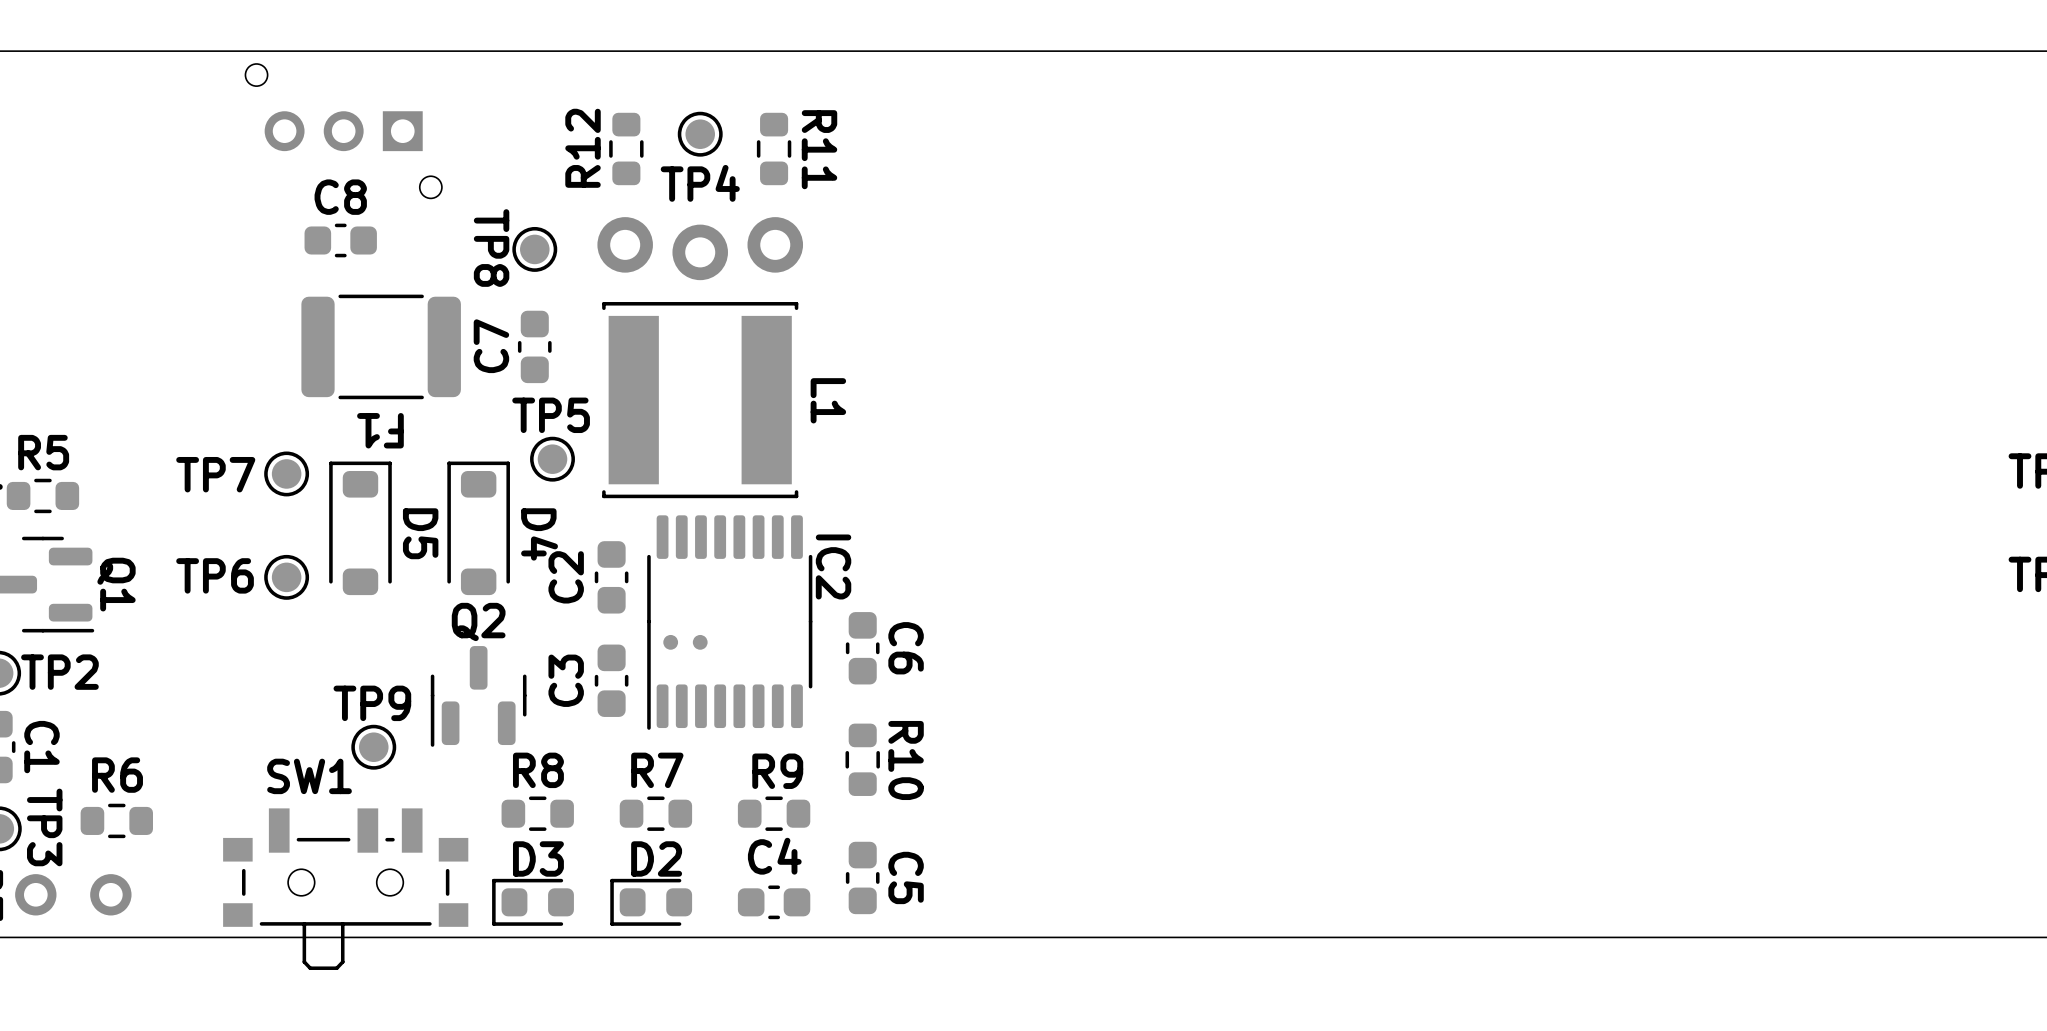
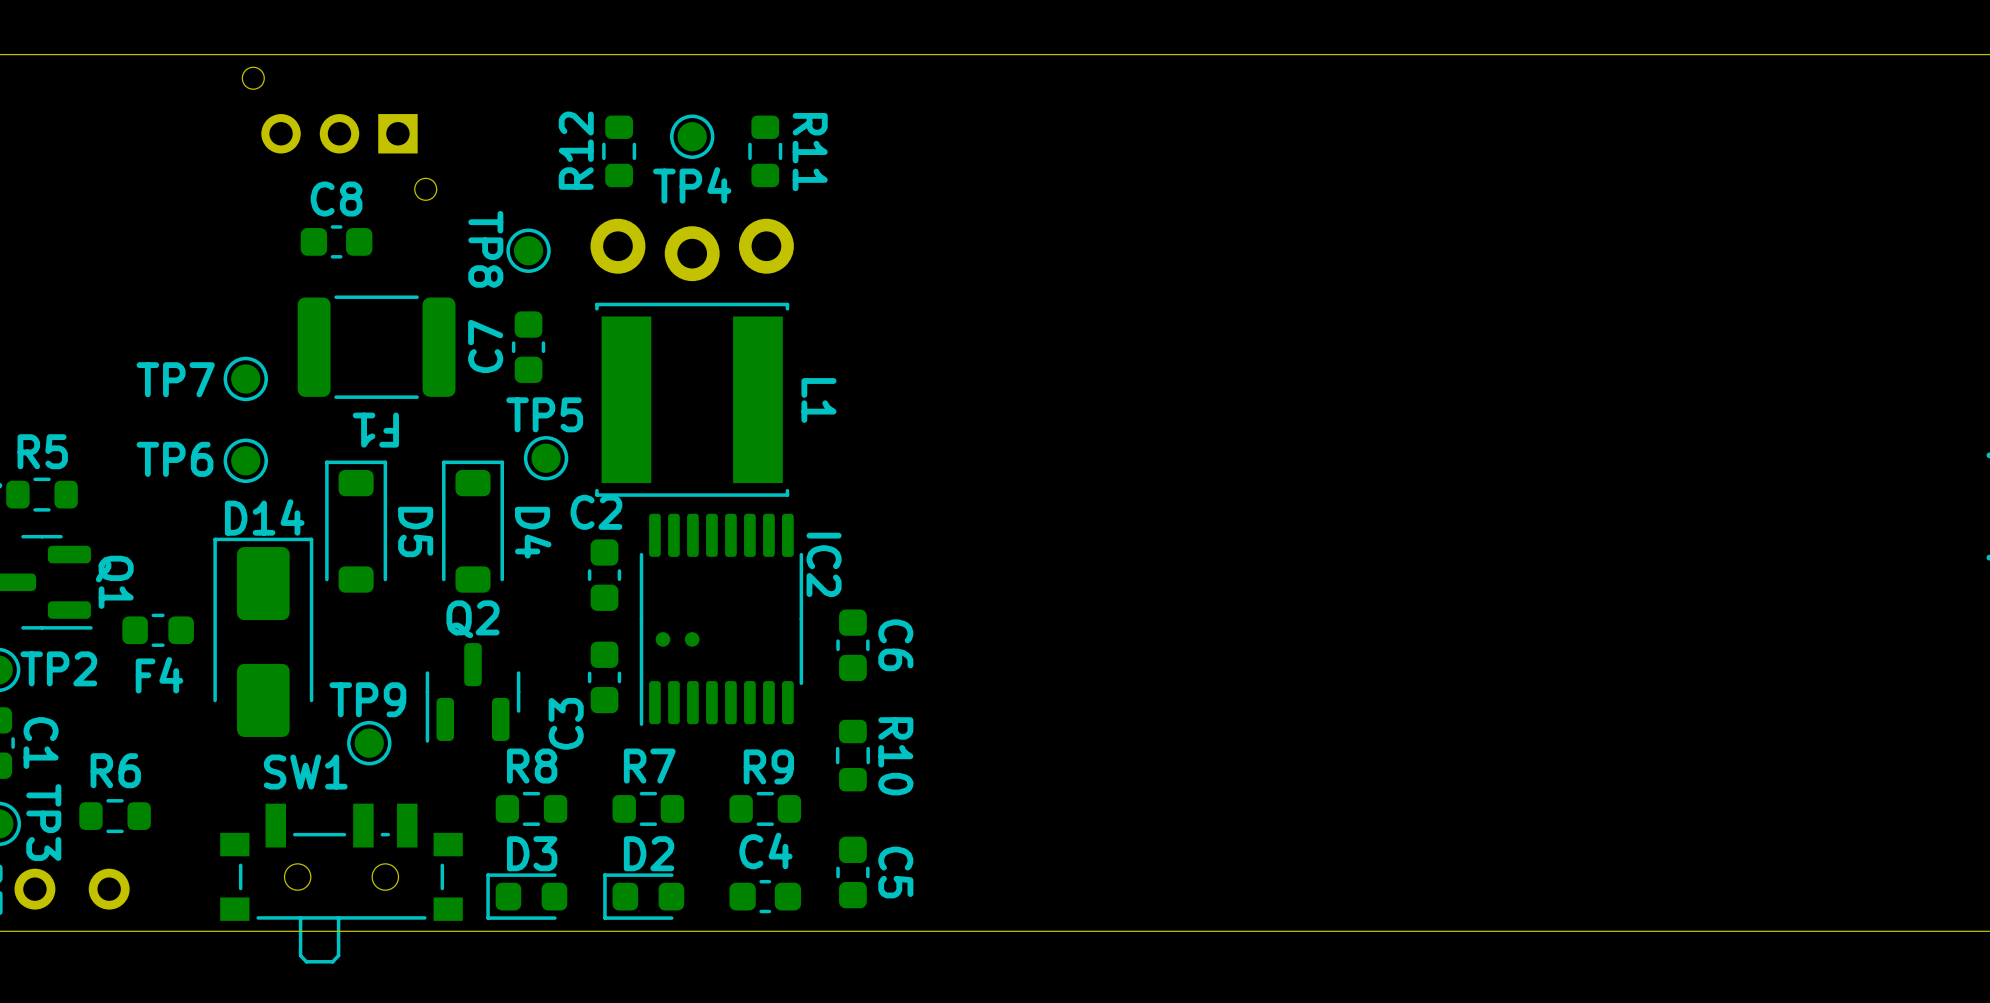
TP7 position: (286, 473) -> (245, 378)
TP6 position: (286, 577) -> (245, 460)
C2 name rotation: 0° (566, 577) -> 90° clockwise (596, 512)
F4: none -> (158, 630)
D14: none -> (263, 637)
C3 name position: C3 (566, 680) -> C3 (566, 723)

